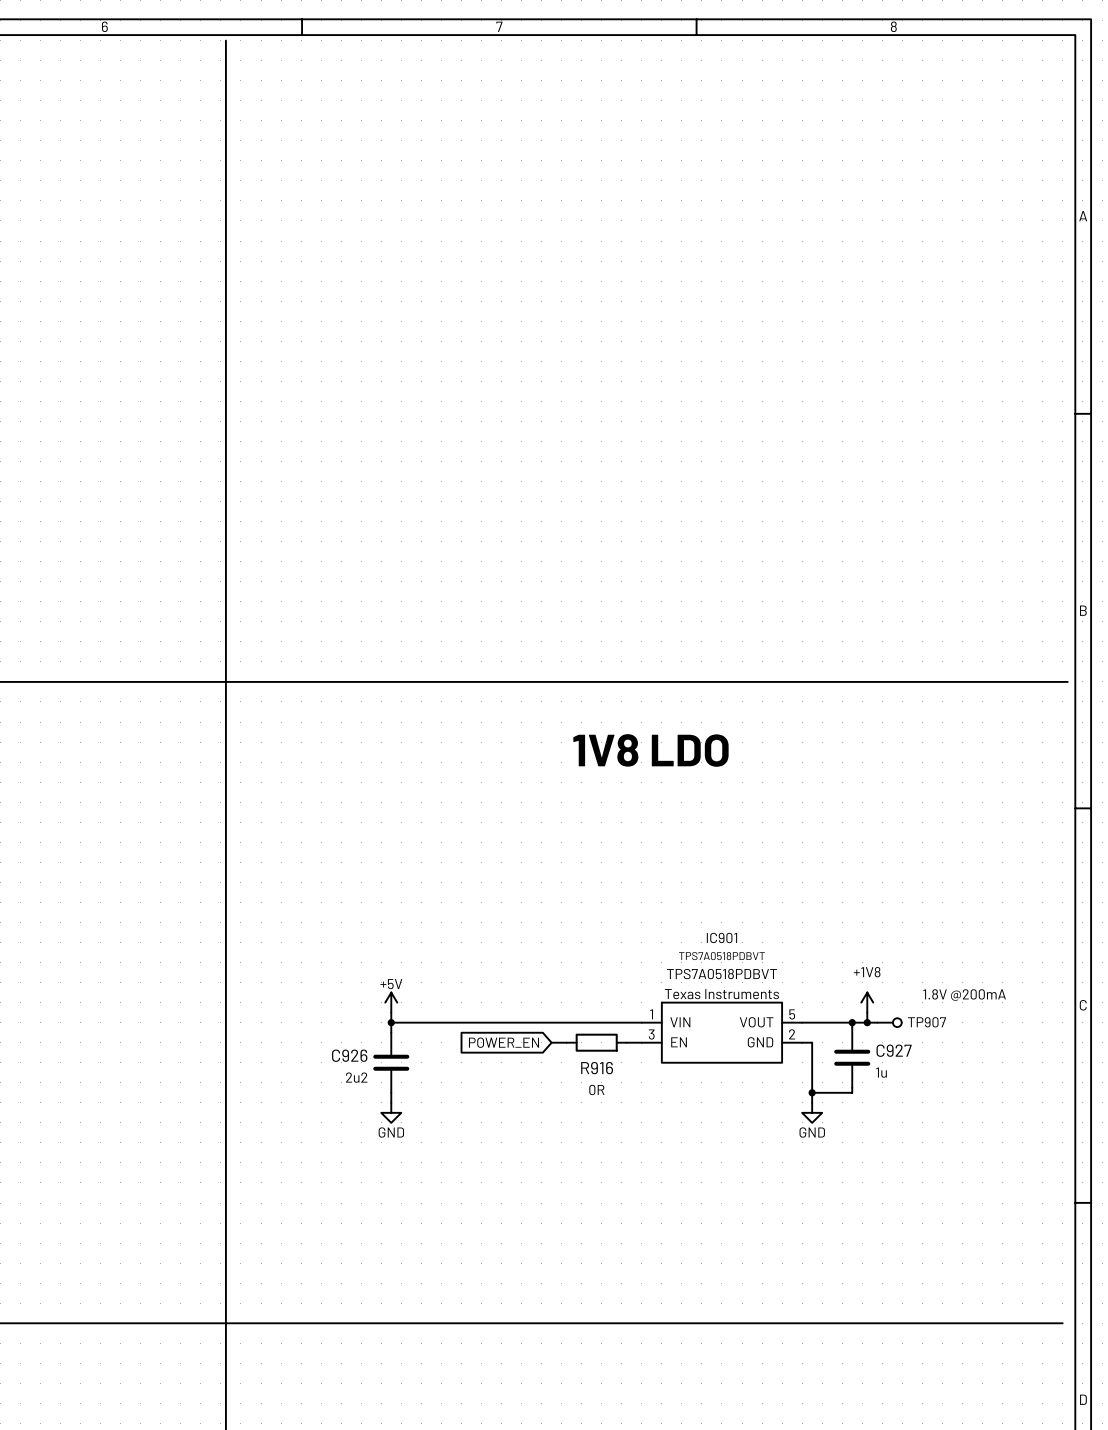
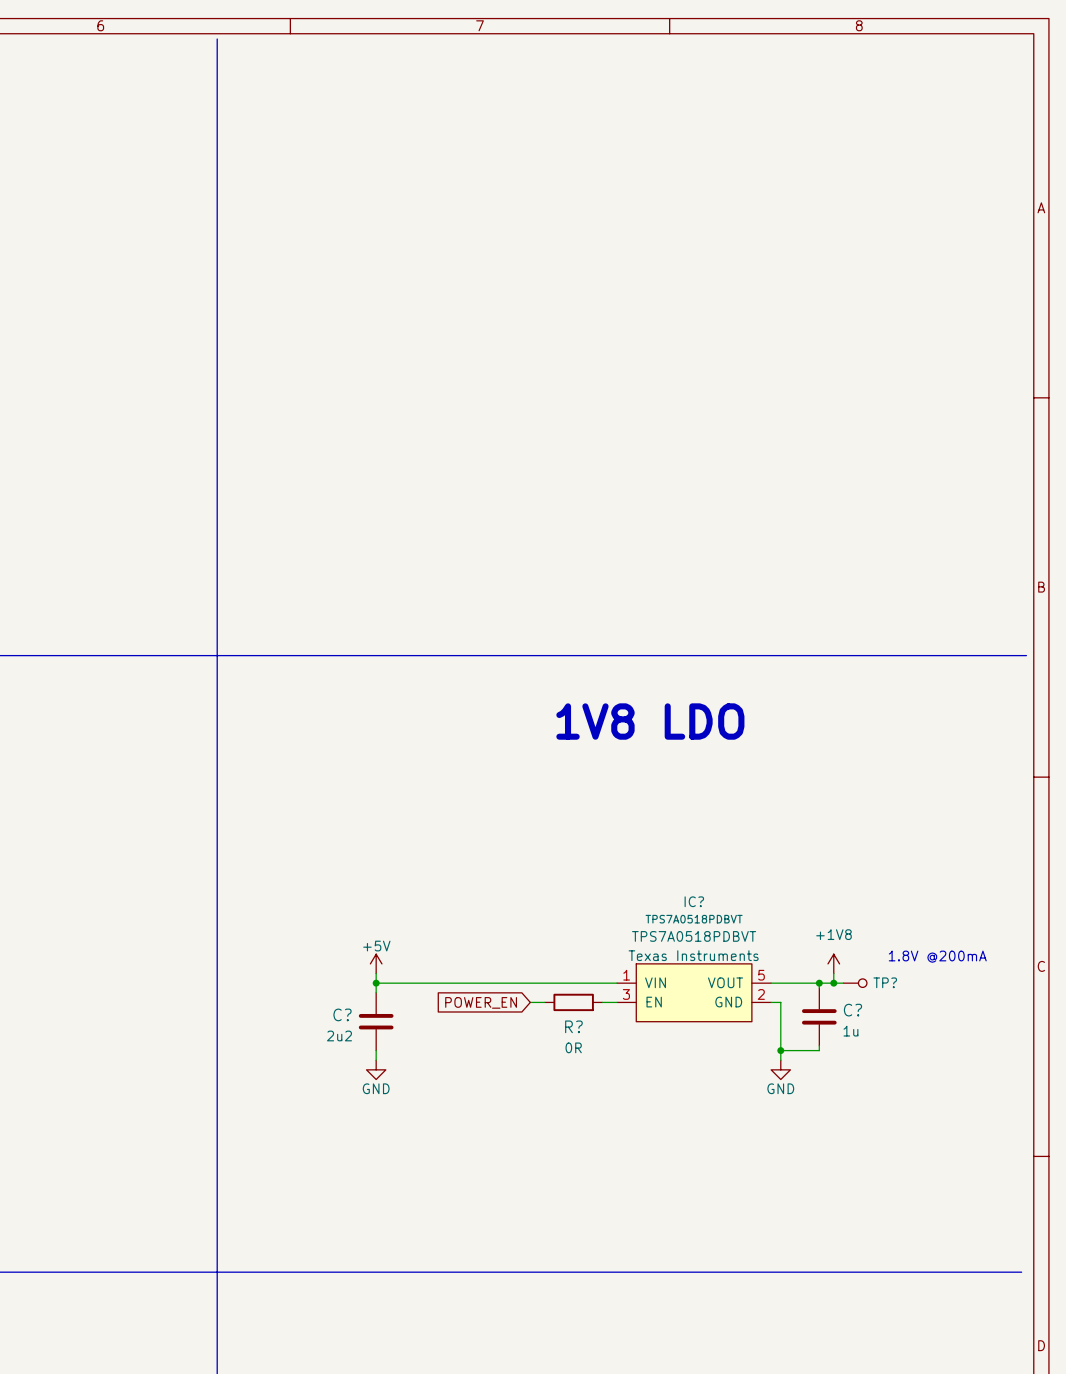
IC901 name: IC901 (721, 937) -> IC? (694, 901)
TP907 name: TP907 (926, 1022) -> TP? (885, 982)
C927 name: C927 (894, 1050) -> C? (852, 1010)
C926 name: C926 (349, 1055) -> C? (342, 1014)
R916 name: R916 (597, 1068) -> R? (573, 1026)

